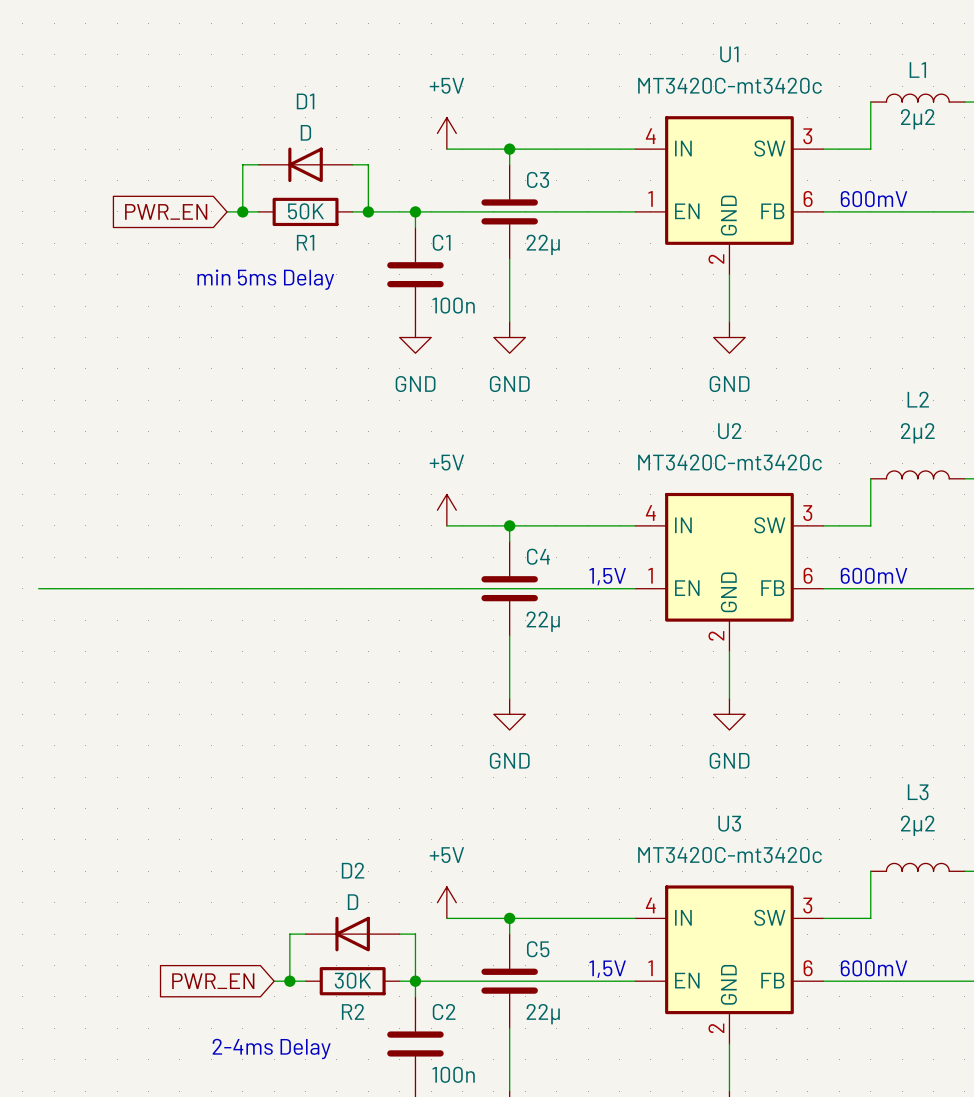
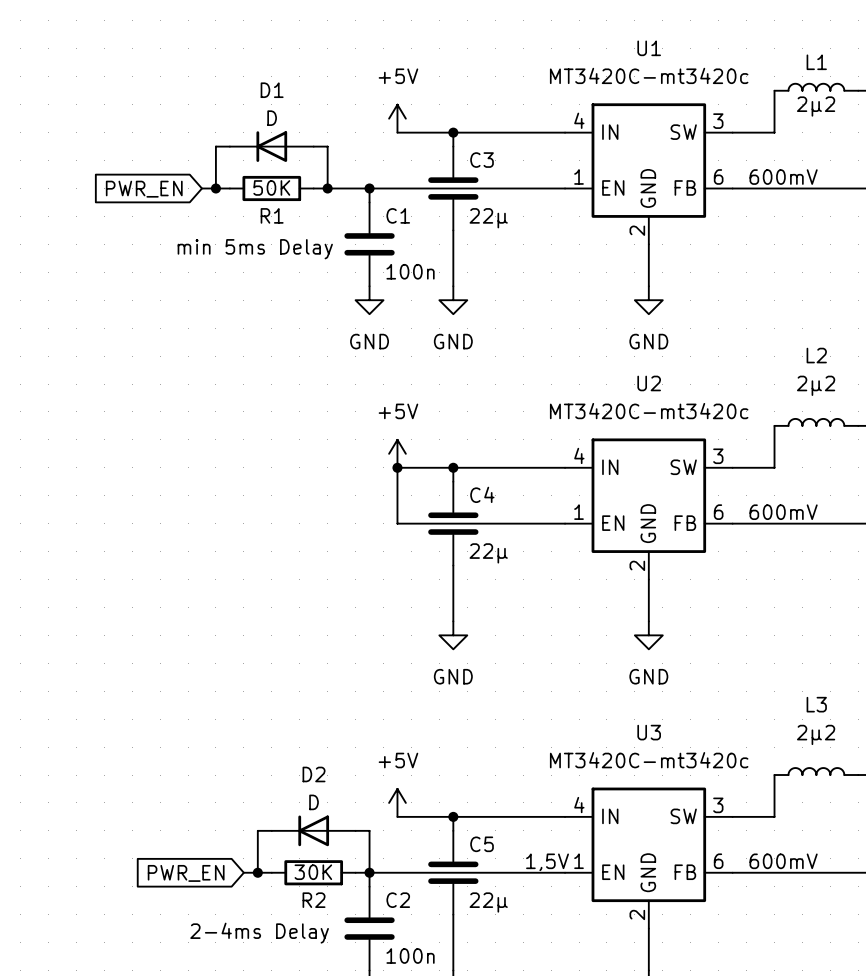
junction: none -> (397, 467)
text: 1,5V (607, 576) -> none
wire: (38, 588) (446, 588) -> (397, 467) (397, 523)

